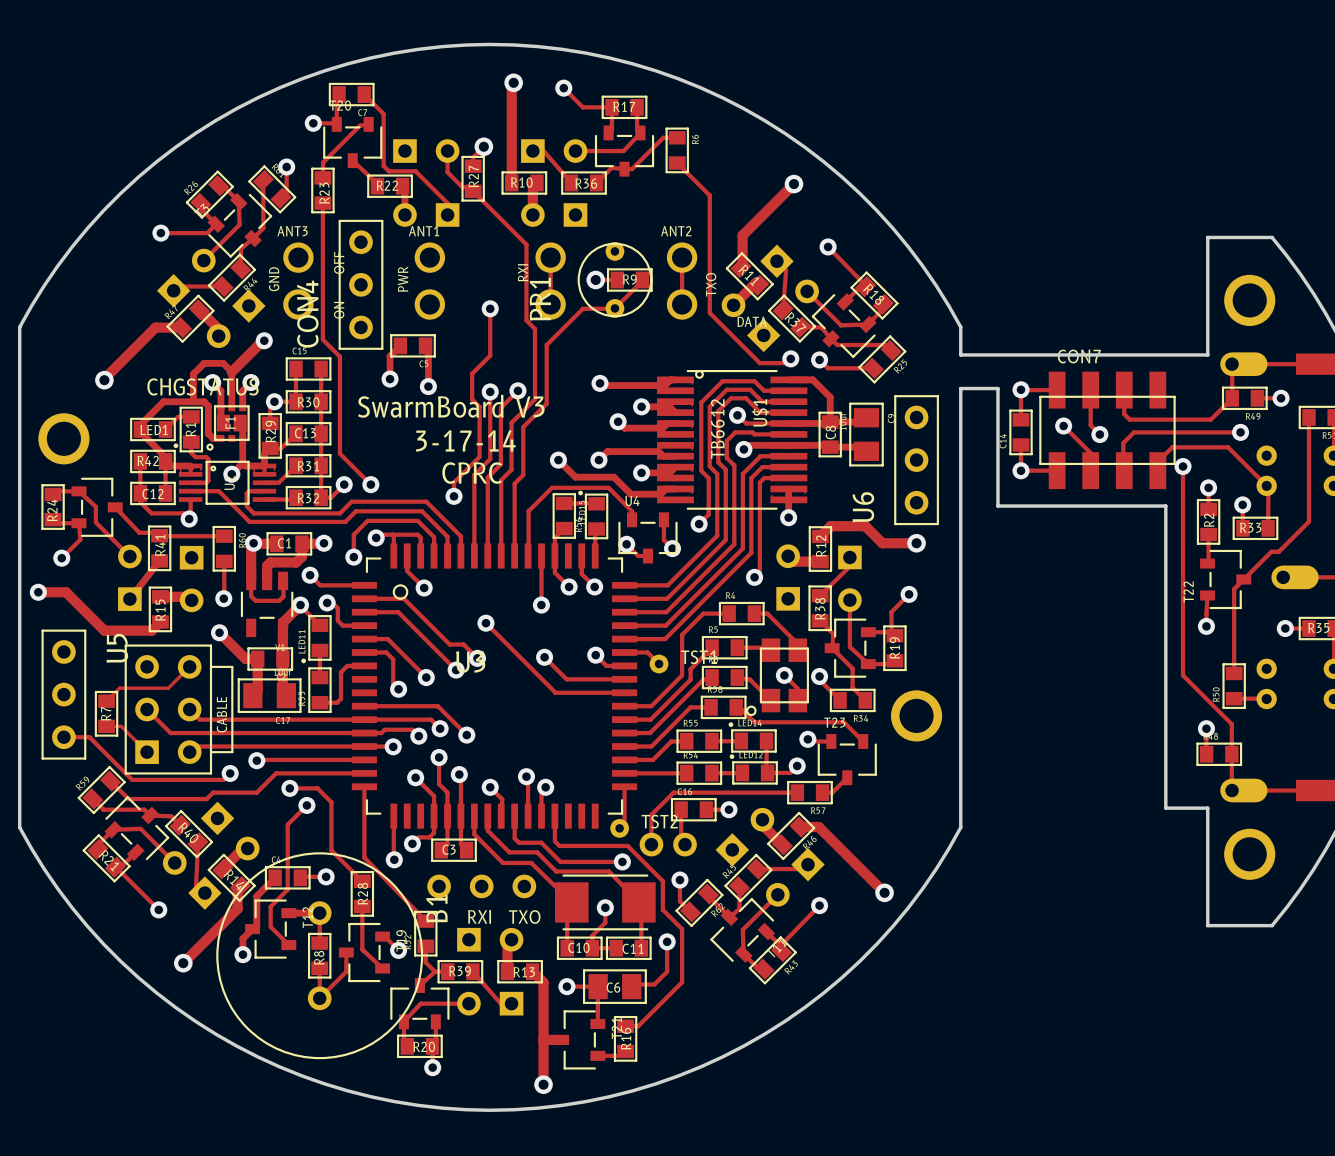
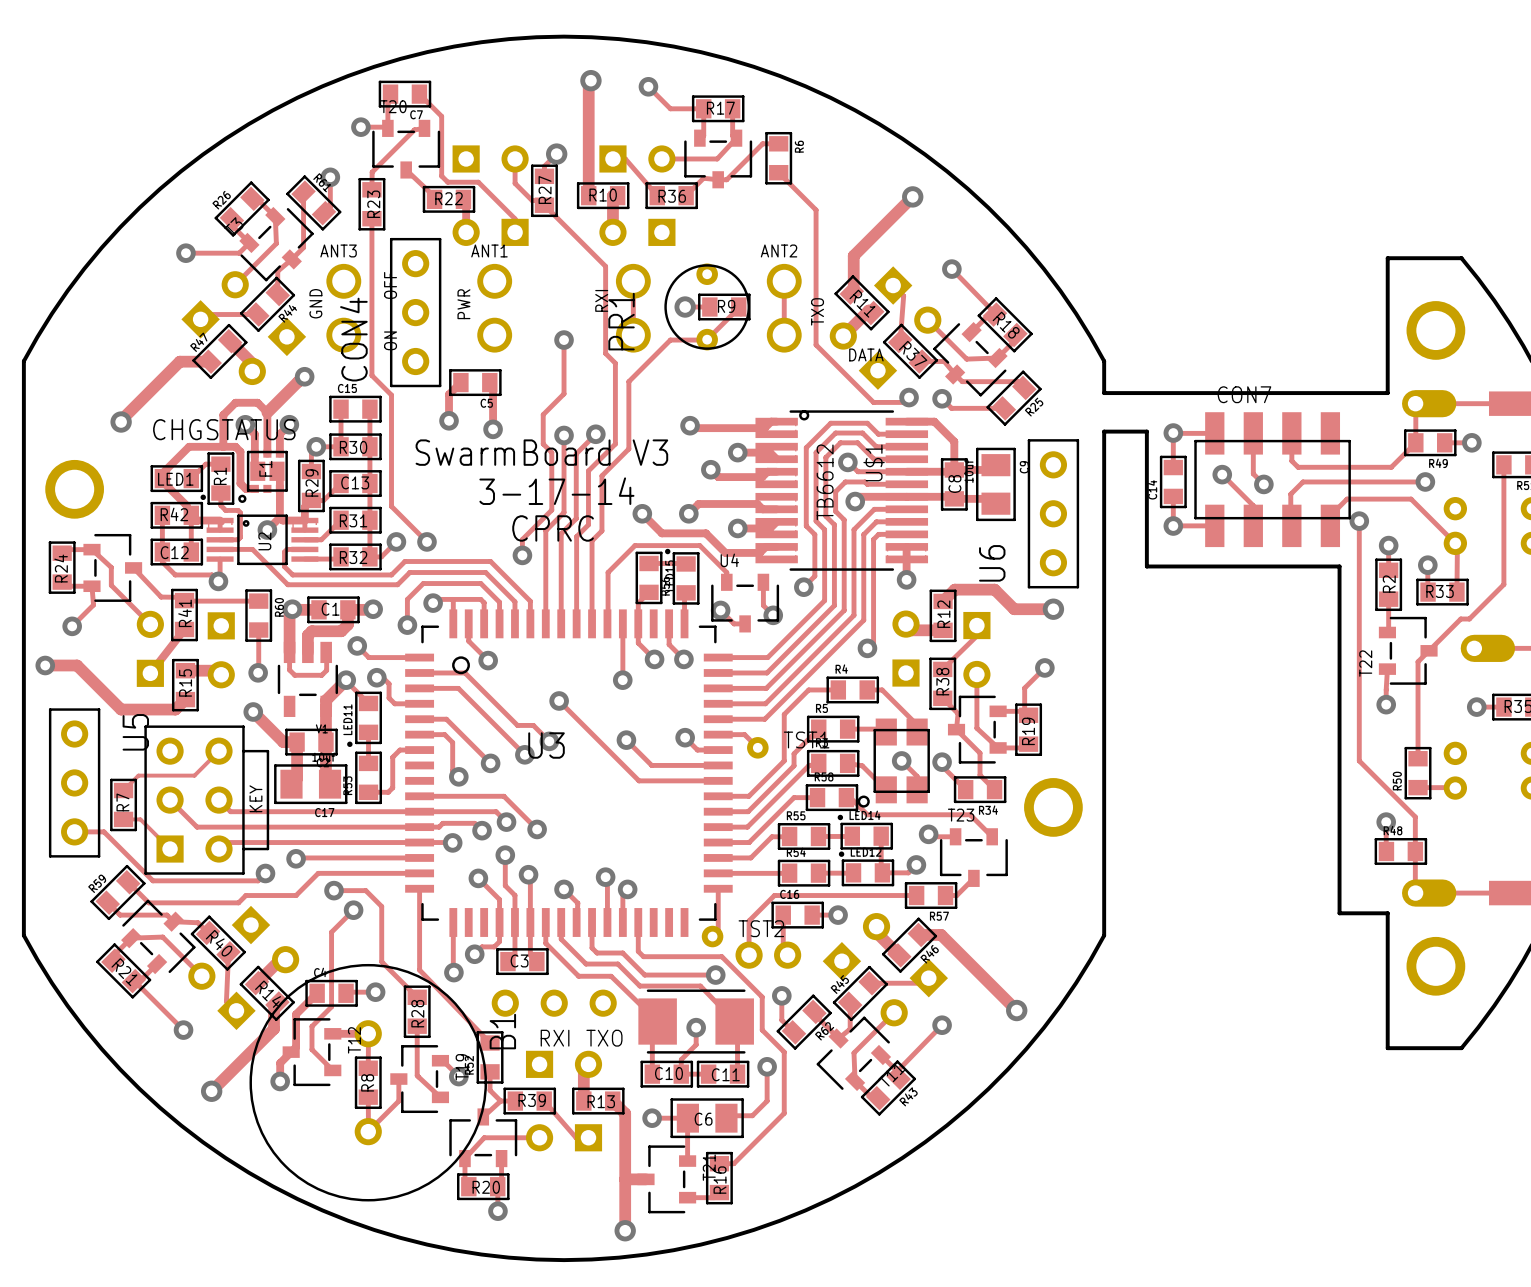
text: CABLE (221, 714) -> KEY (255, 798)

